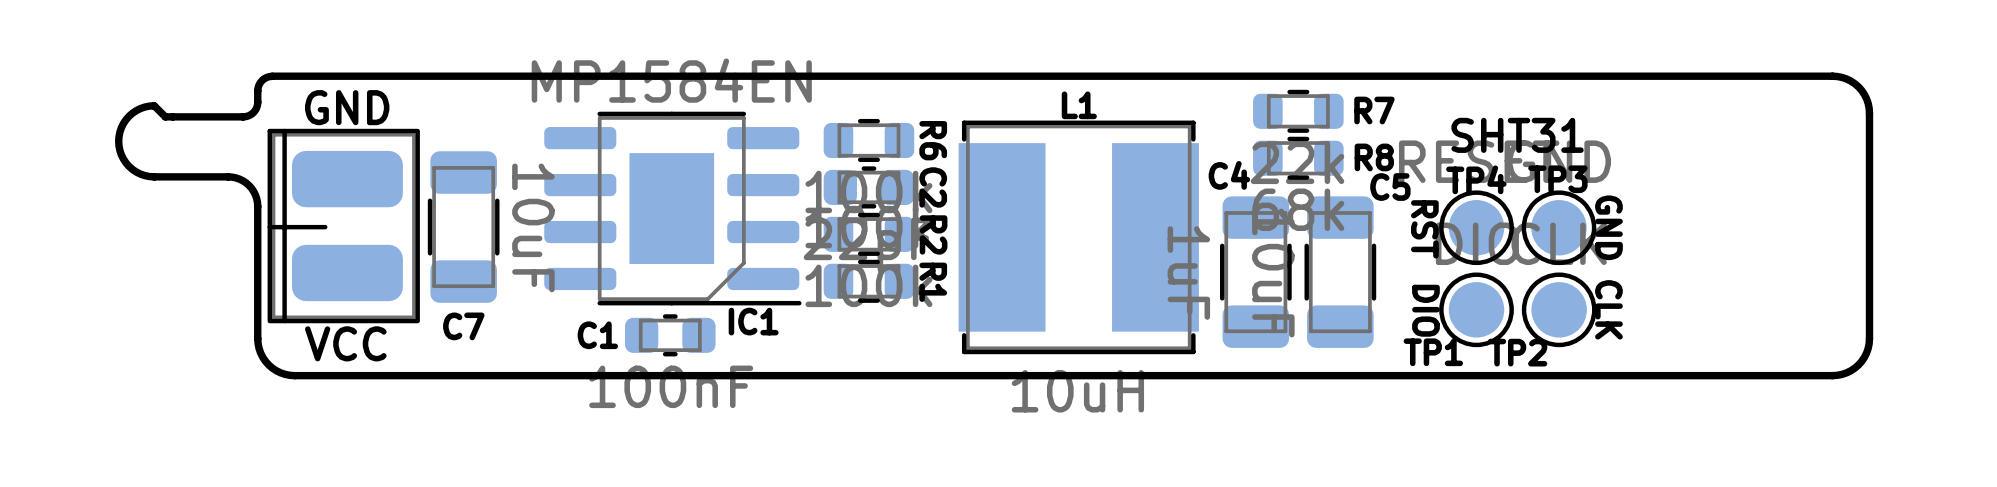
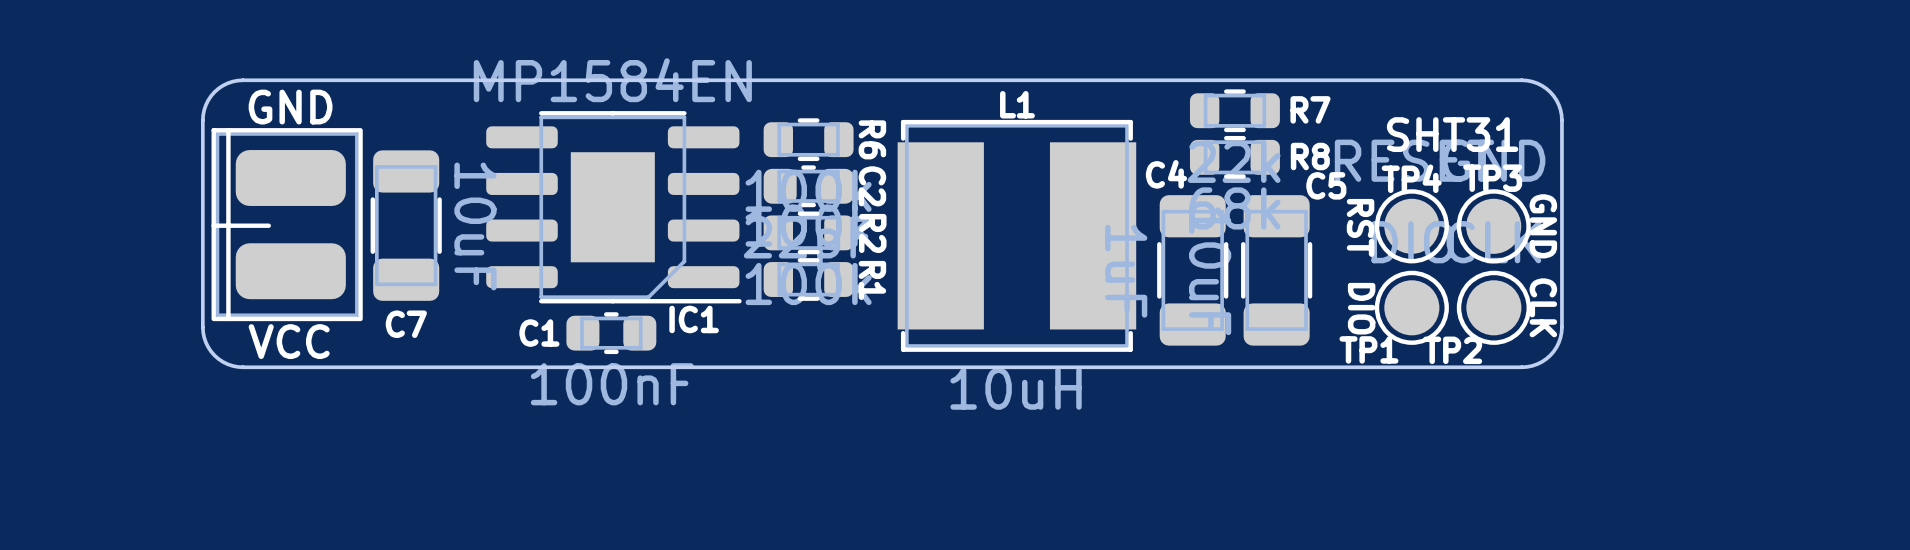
board edge: (1832, 76) (272, 76) (265, 78) (259, 83) (256, 107) (248, 115) (165, 116) (154, 105) (149, 106) (140, 108) (129, 116) (121, 127) (118, 141) (123, 159) (129, 166) (140, 174) (154, 176) (232, 177) (242, 180) (251, 188) (255, 195) (257, 206) (259, 348) (265, 361) (272, 368) (289, 375) (1832, 375) (1846, 372) (1858, 364) (1866, 352) (1869, 338) (1869, 108) (1864, 94) (1855, 83) (1846, 79) (1832, 76) -> (1521, 80) (1537, 83) (1550, 92) (1558, 105) (1561, 120) (1561, 332) (1558, 342) (1550, 355) (1541, 361) (1527, 366) (243, 367) (227, 364) (214, 355) (208, 347) (203, 332) (203, 115) (205, 105) (214, 92) (222, 85) (237, 80) (1521, 80)

